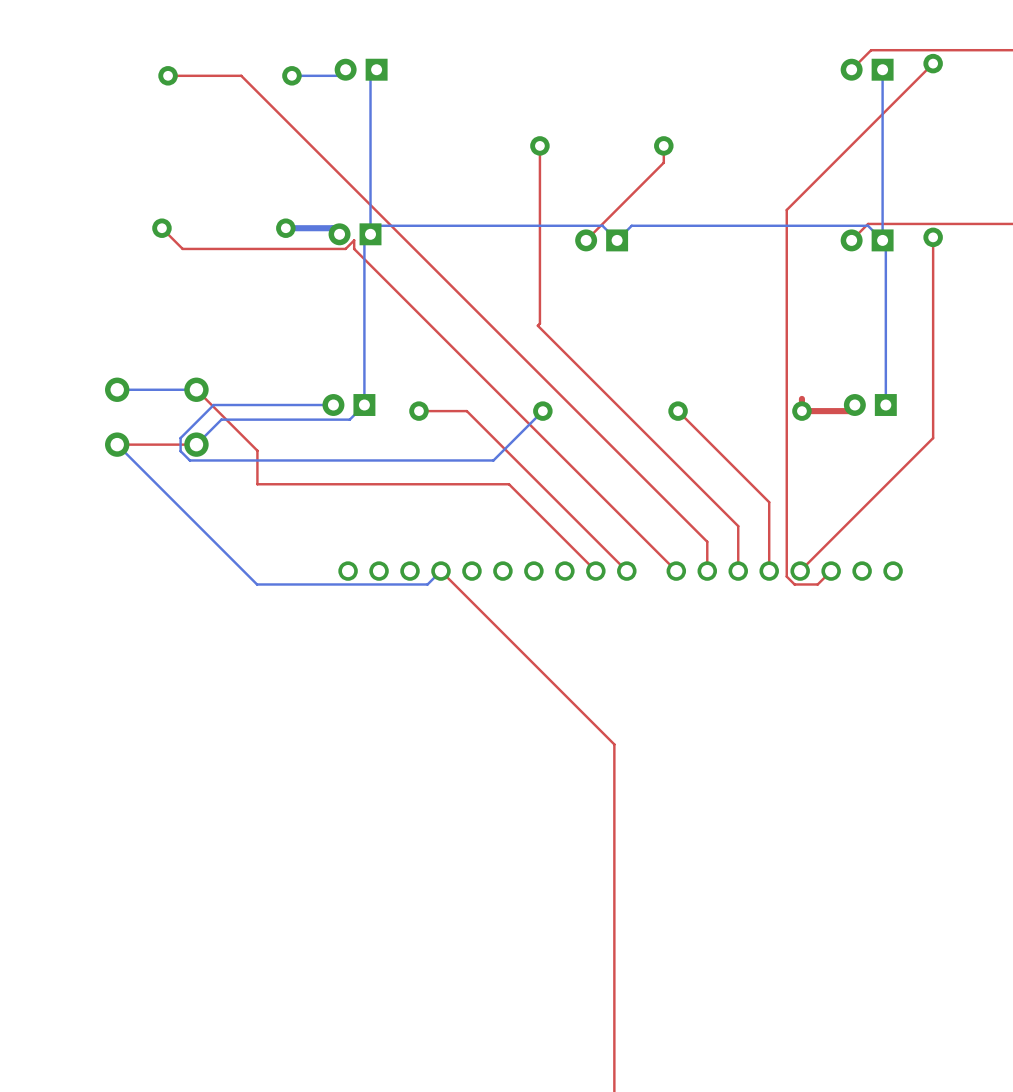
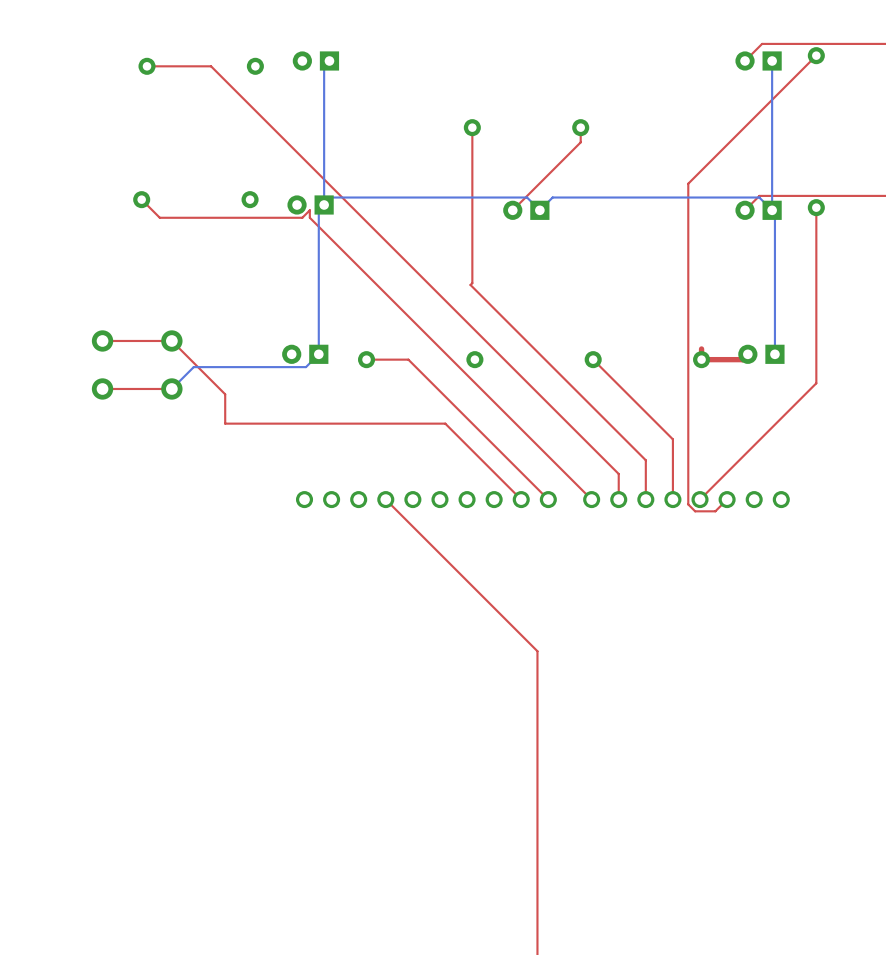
bottom track: (345, 69) (339, 75) (291, 75) -> none
bottom track: (285, 228) (333, 228) (339, 234) -> none
top track: none -> (171, 340) (102, 340)
bottom track: (196, 389) (117, 389) -> none
bottom track: (333, 405) (213, 405) (180, 438) (180, 451) (189, 460) (493, 460) (542, 411) -> none
bottom track: (117, 444) (257, 584) (427, 584) (440, 571) -> none

